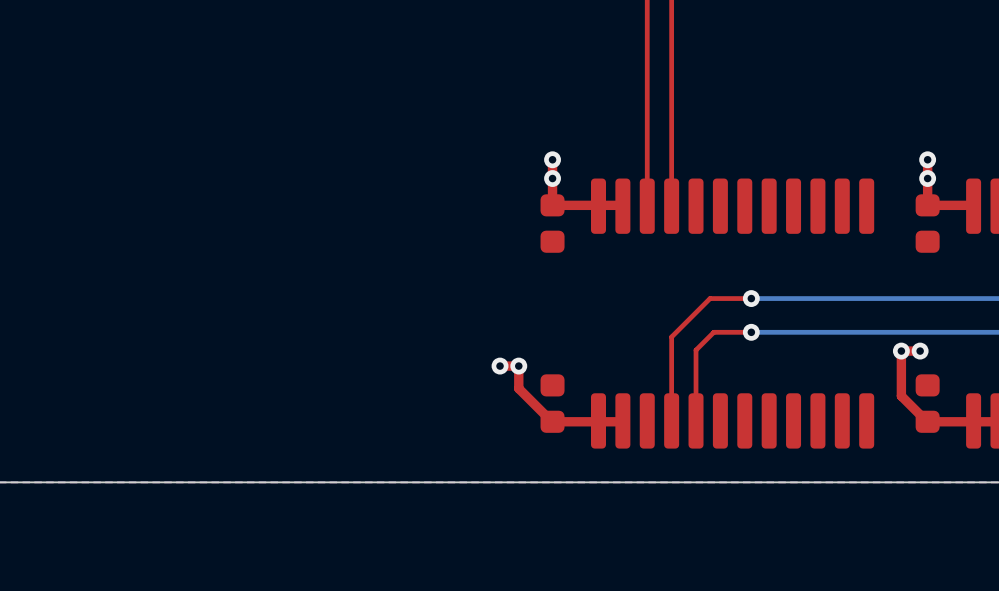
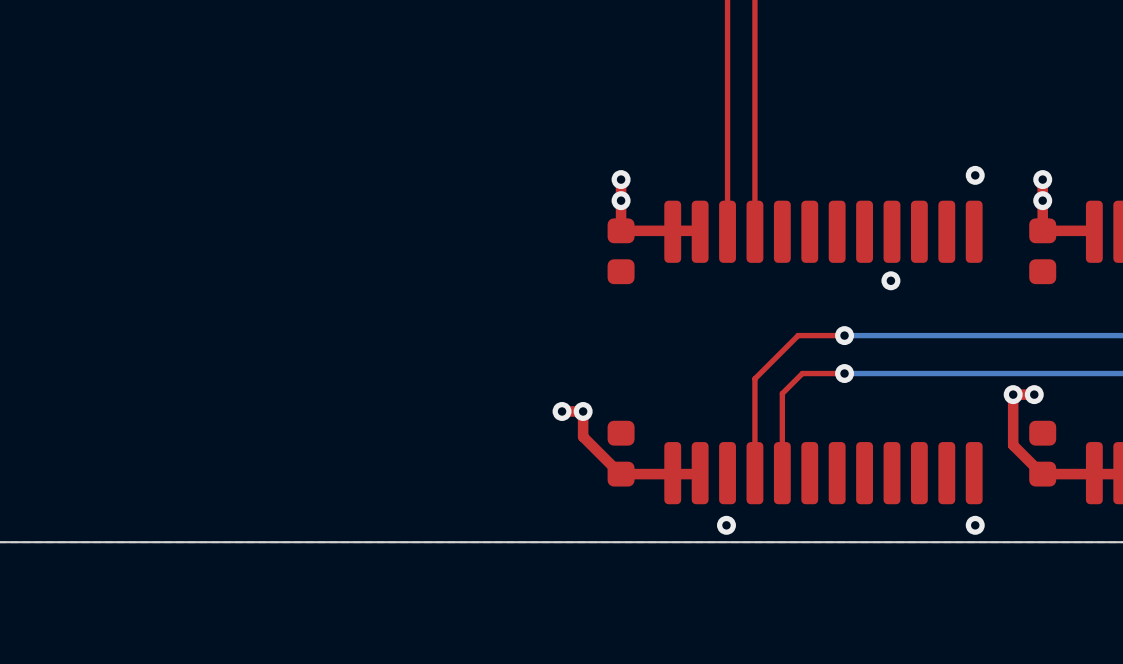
via: none -> (975, 175)
via: none -> (890, 280)
via: none -> (726, 525)
via: none -> (975, 525)

